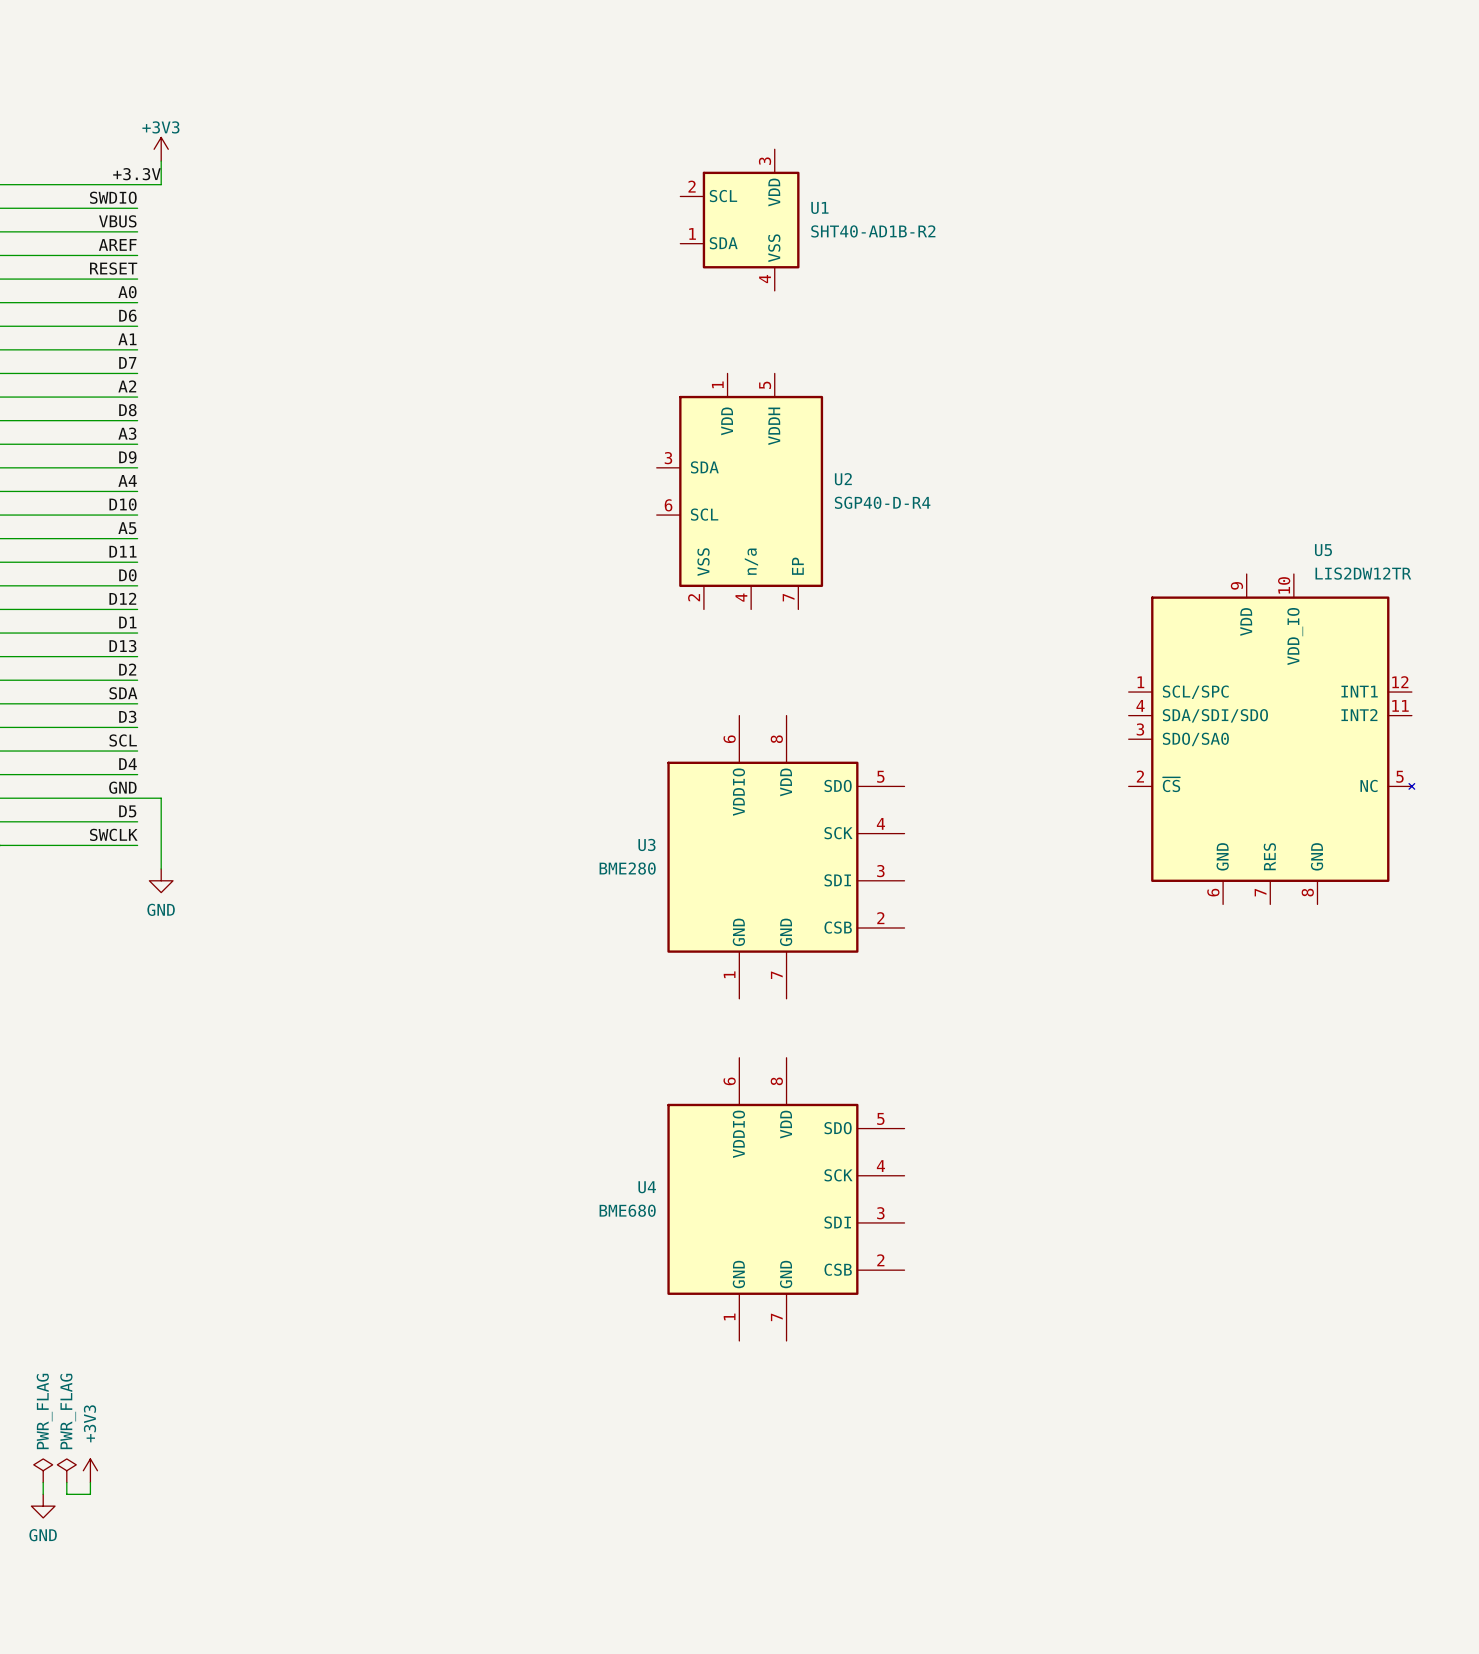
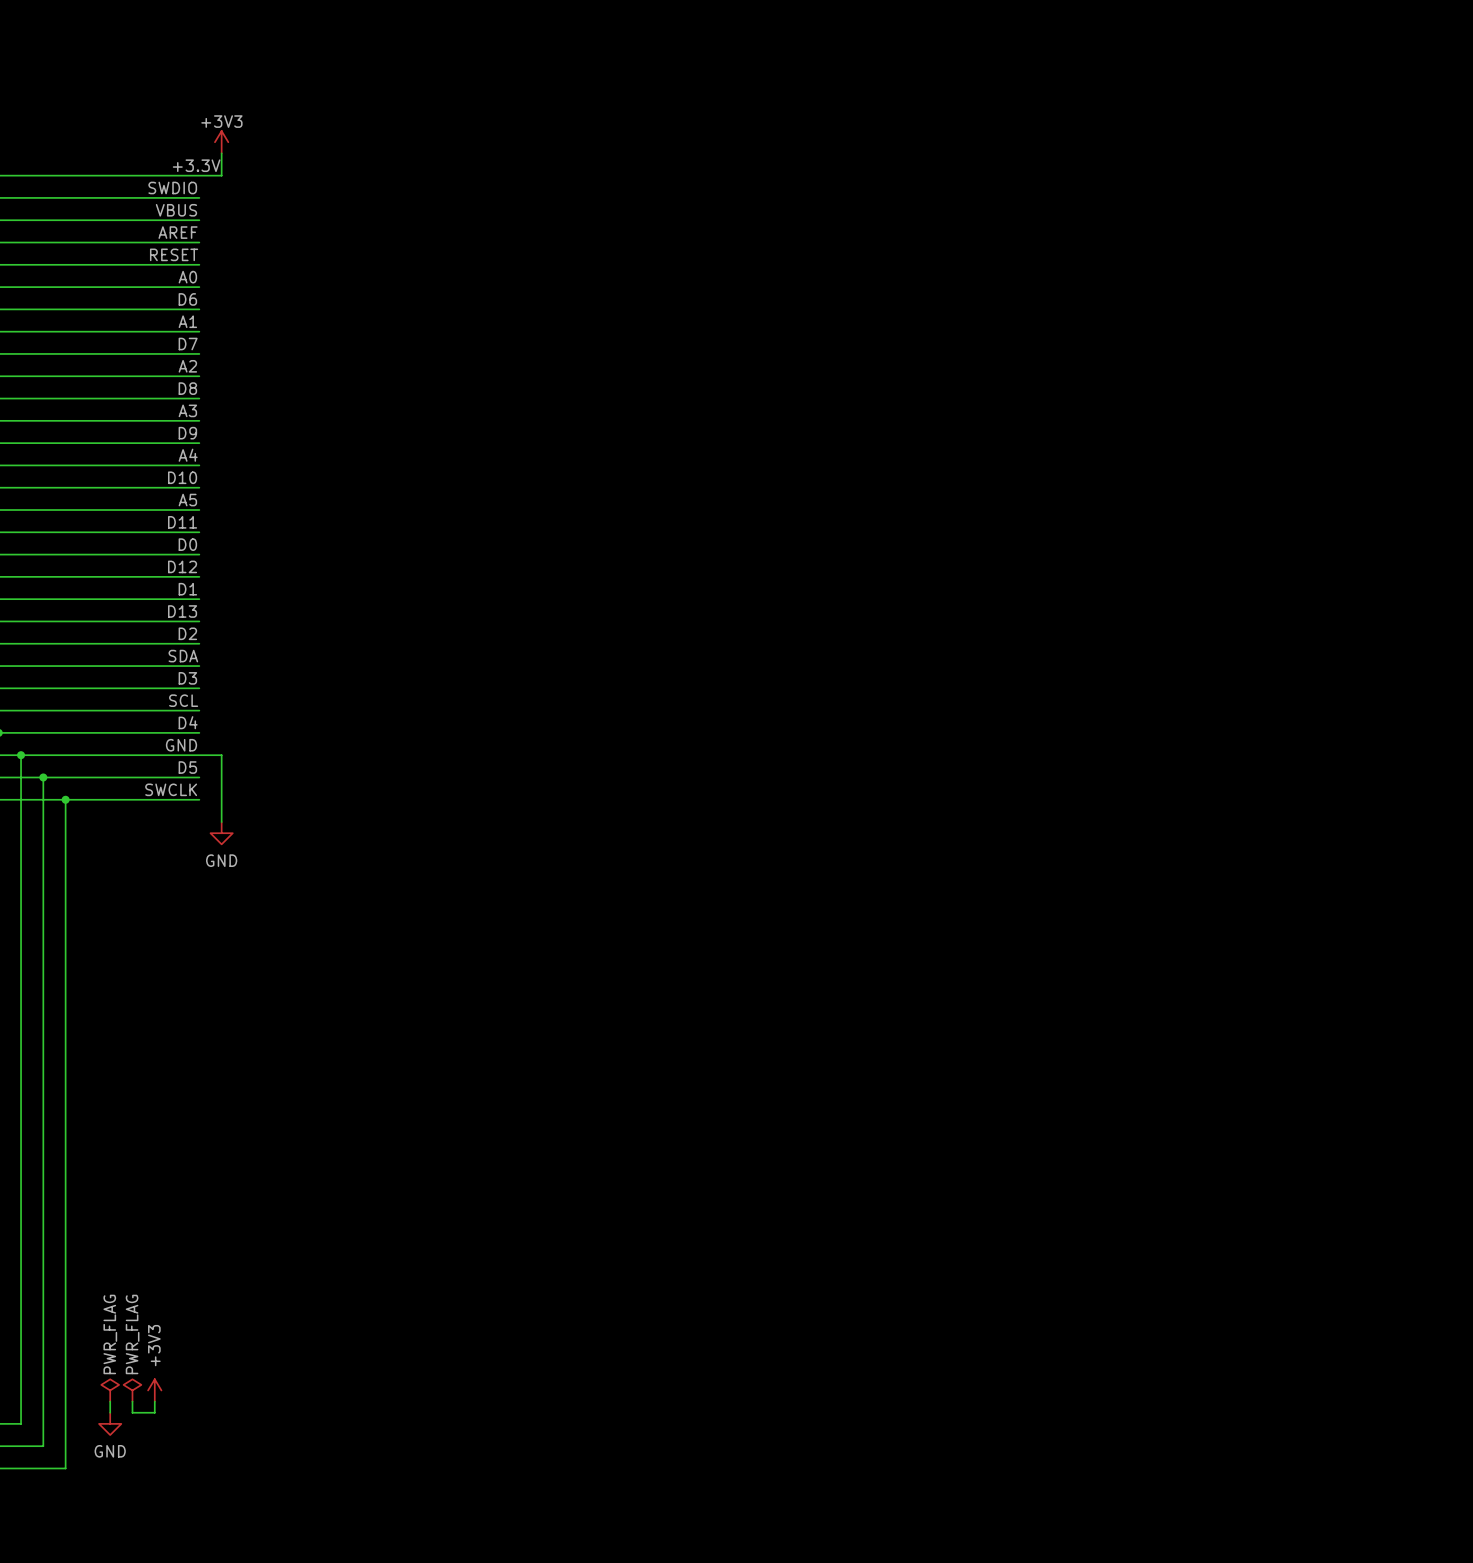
U1: SHT40-AD1B-R2 (739, 220) -> none
U2: SGP40-D-R4 (739, 491) -> none
U5: LIS2DW12TR (1271, 739) -> none
U3: BME280 (785, 857) -> none
U4: BME680 (785, 1199) -> none

